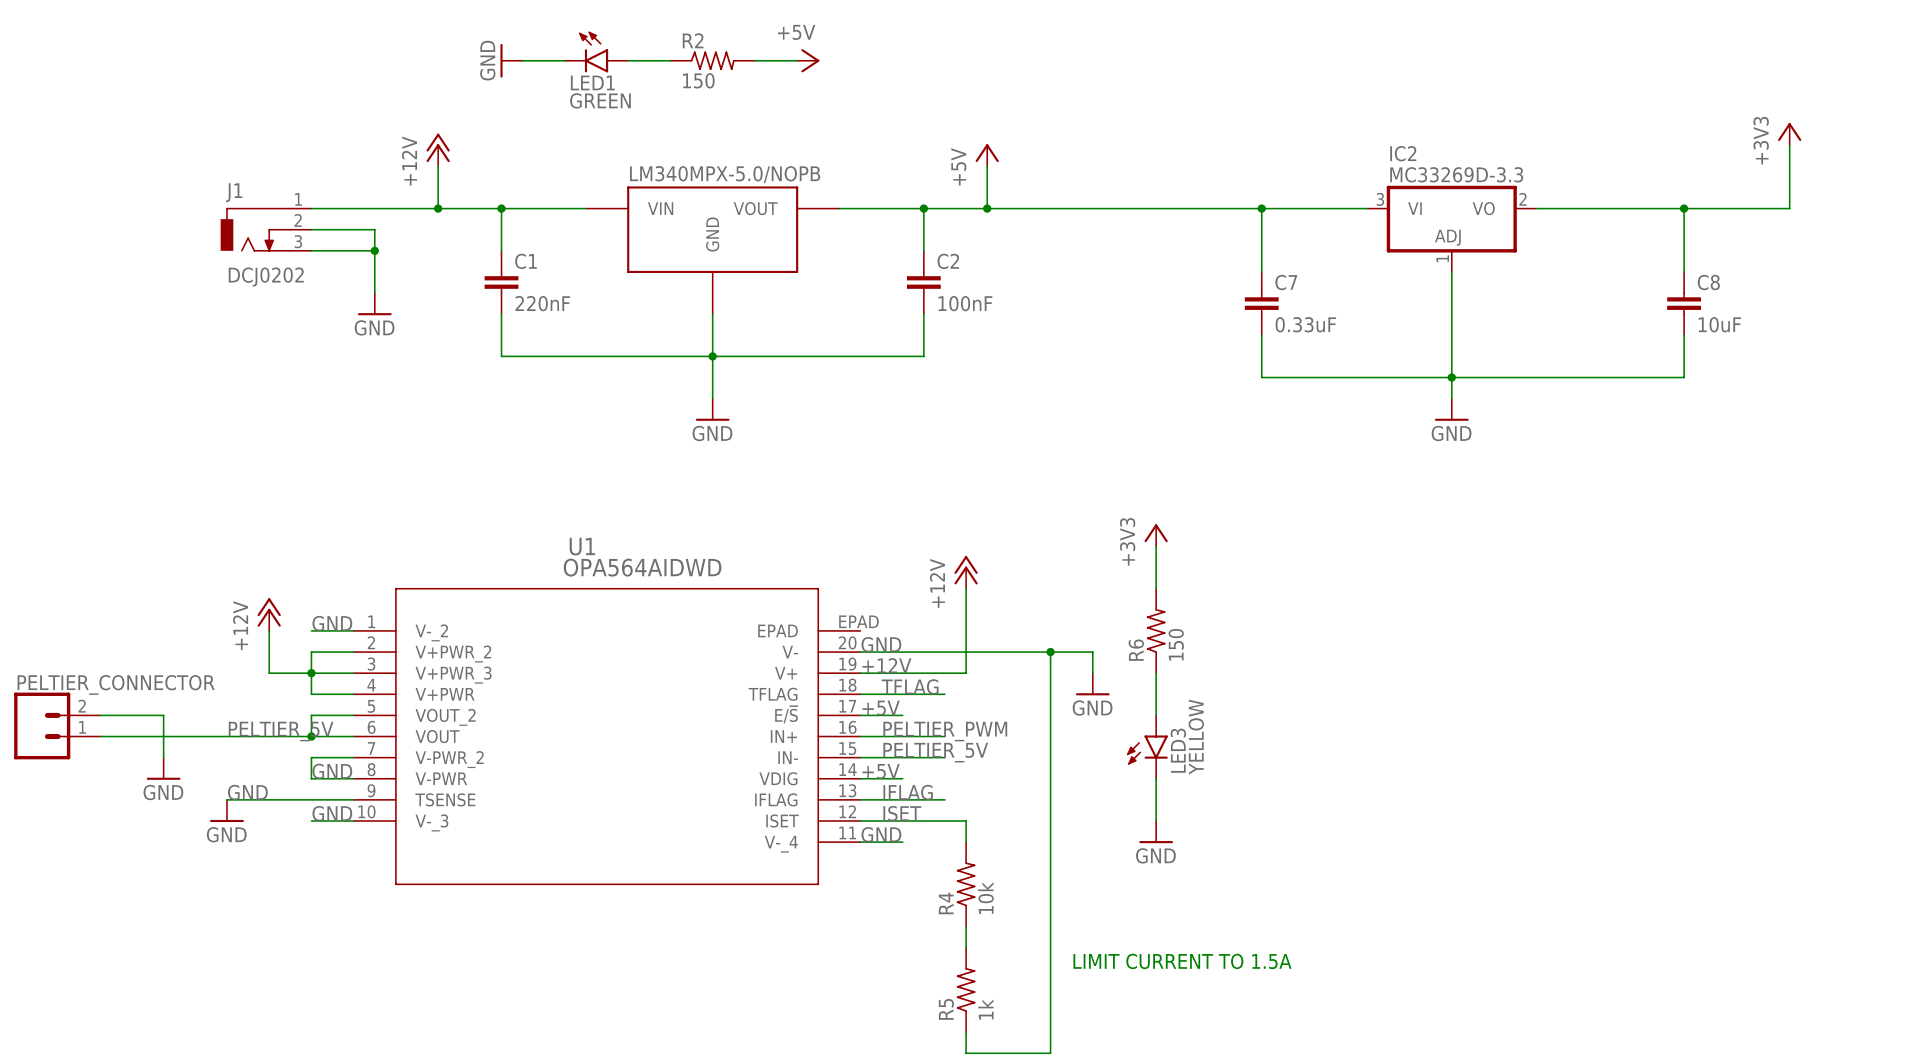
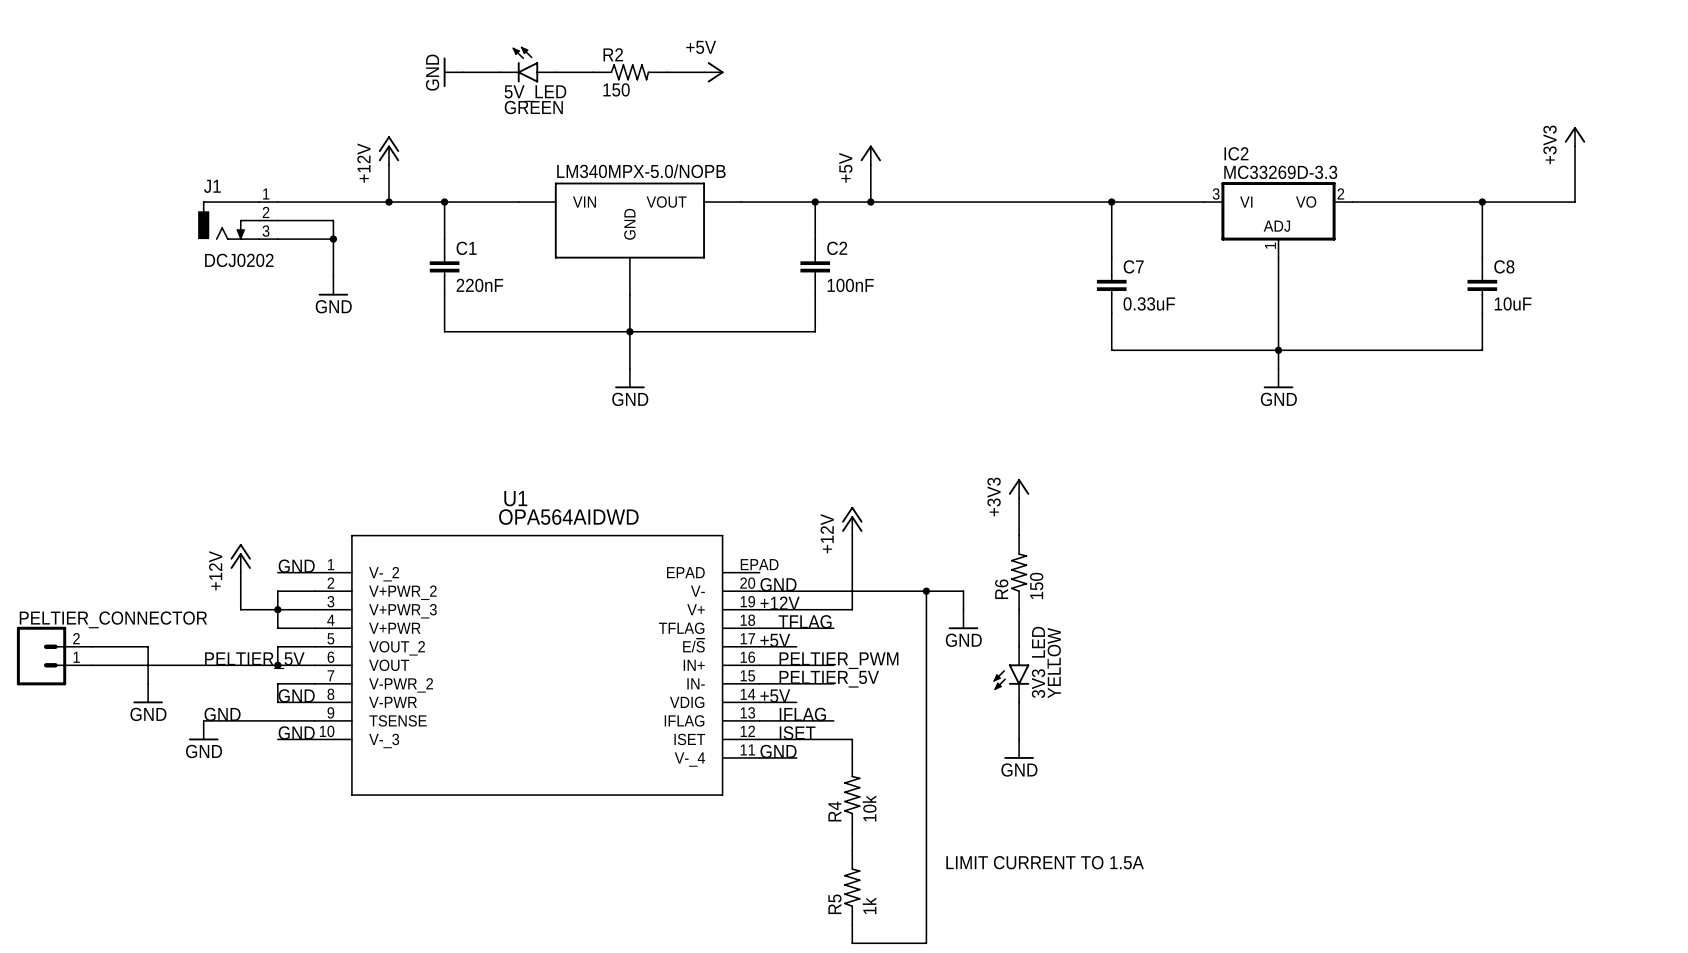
LED1 name: LED1 (592, 82) -> 5V_LED (535, 93)
LED3 name: LED3 (1178, 750) -> 3V3_LED (1040, 662)

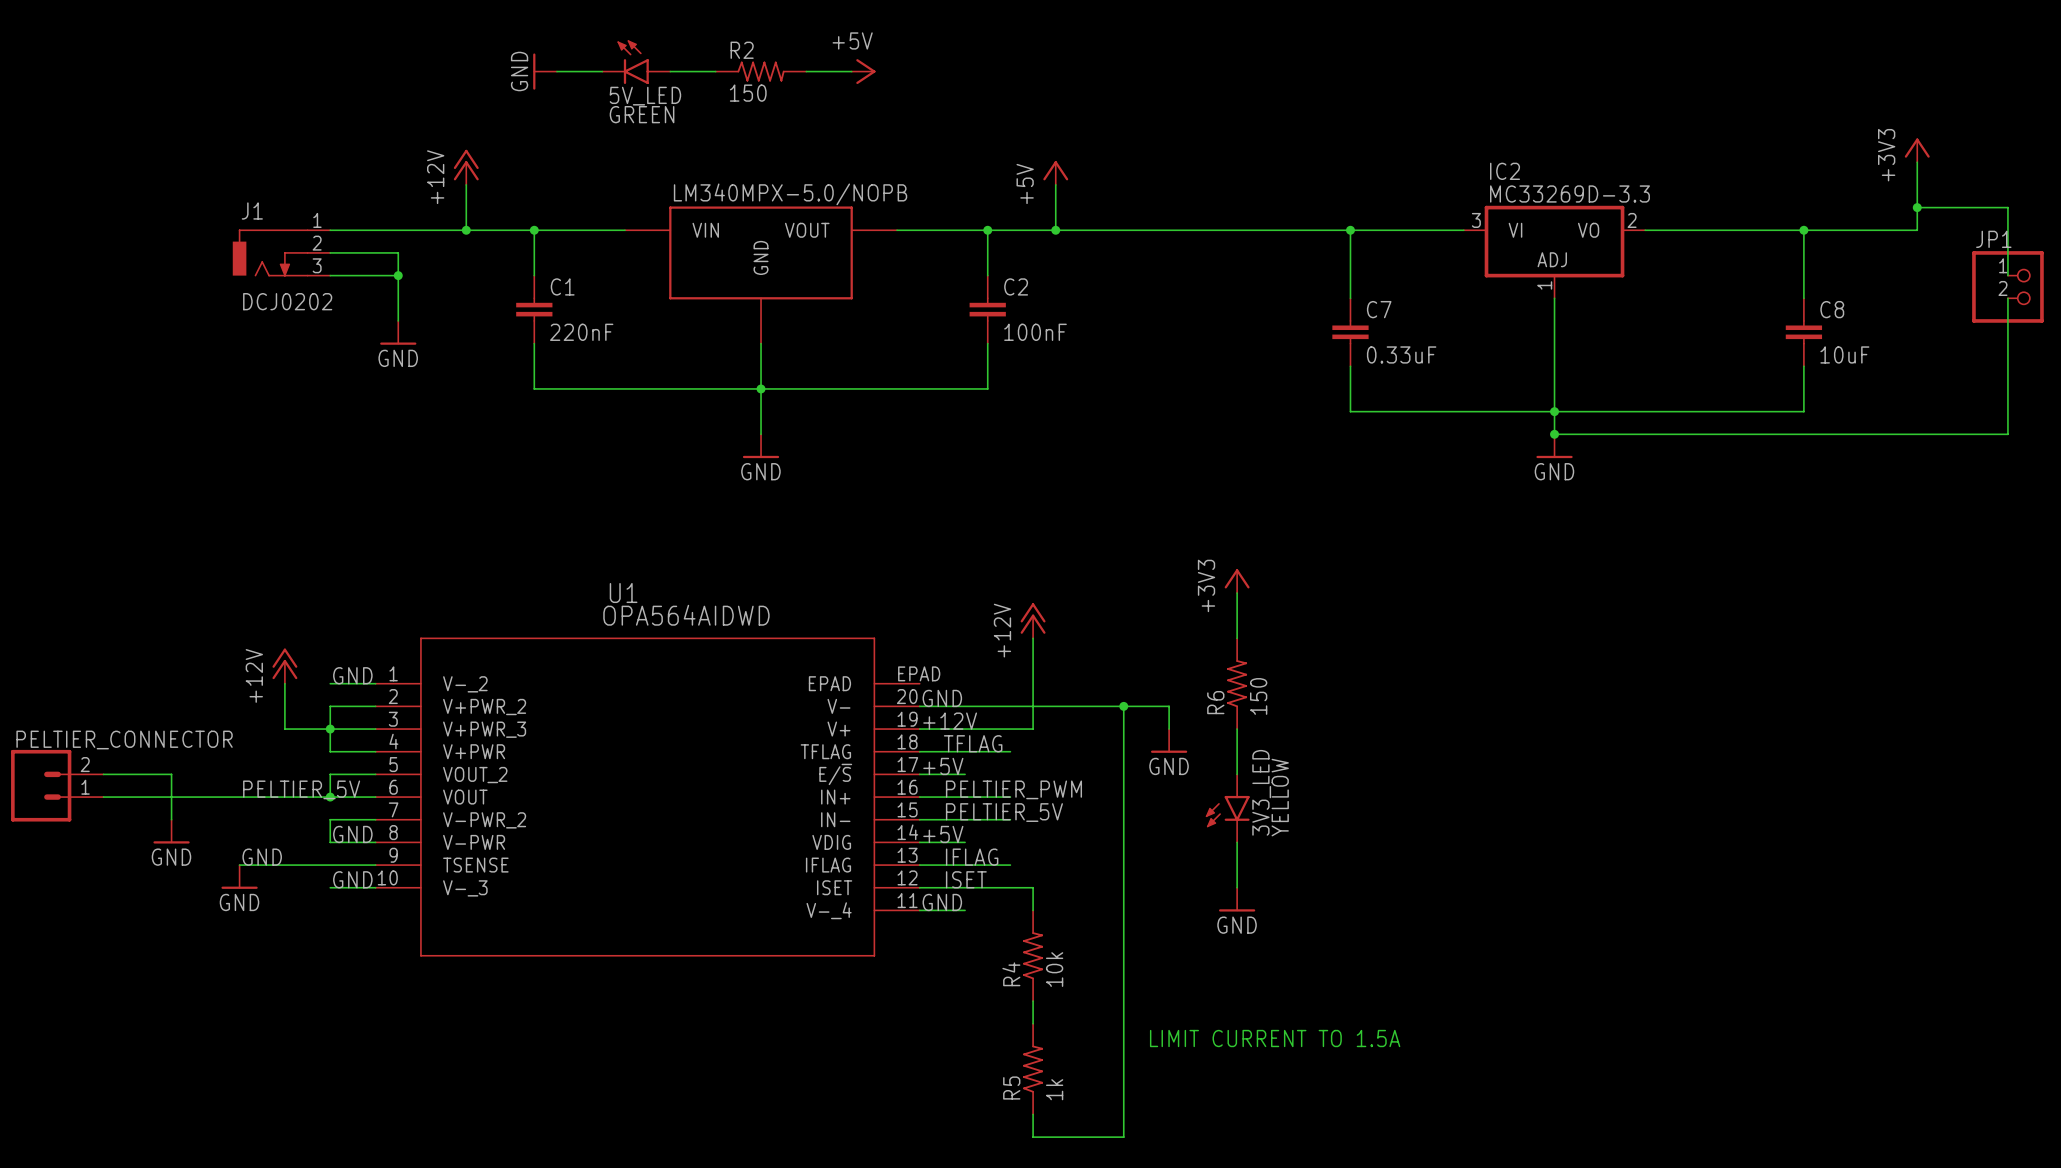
wire: none -> (1917, 207) (2007, 207) (2007, 275)
junction: none -> (1917, 207)
JP1: none -> (2007, 286)
wire: none -> (2007, 298) (2007, 434) (1554, 434)
junction: none -> (1554, 434)

